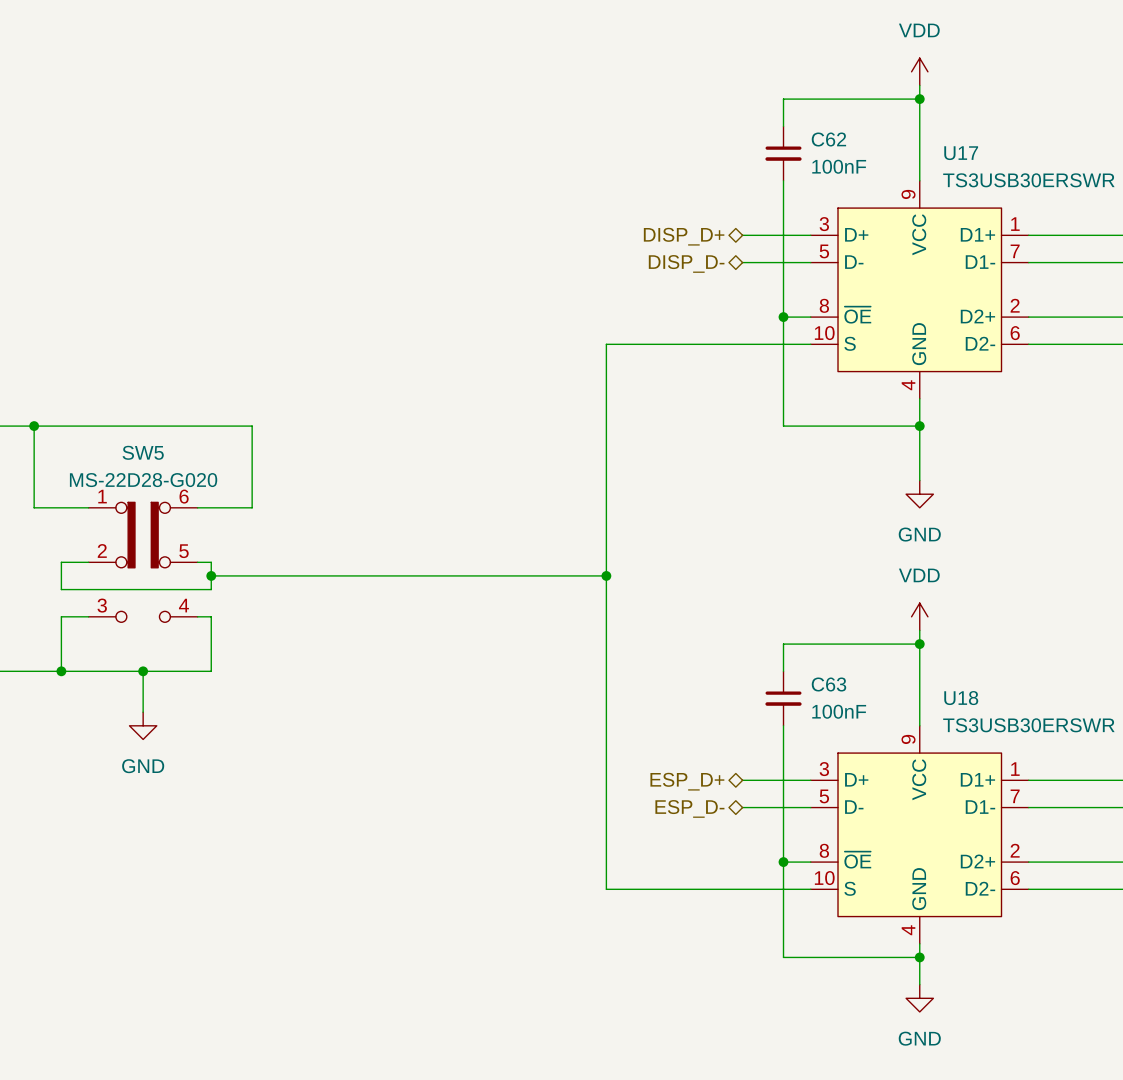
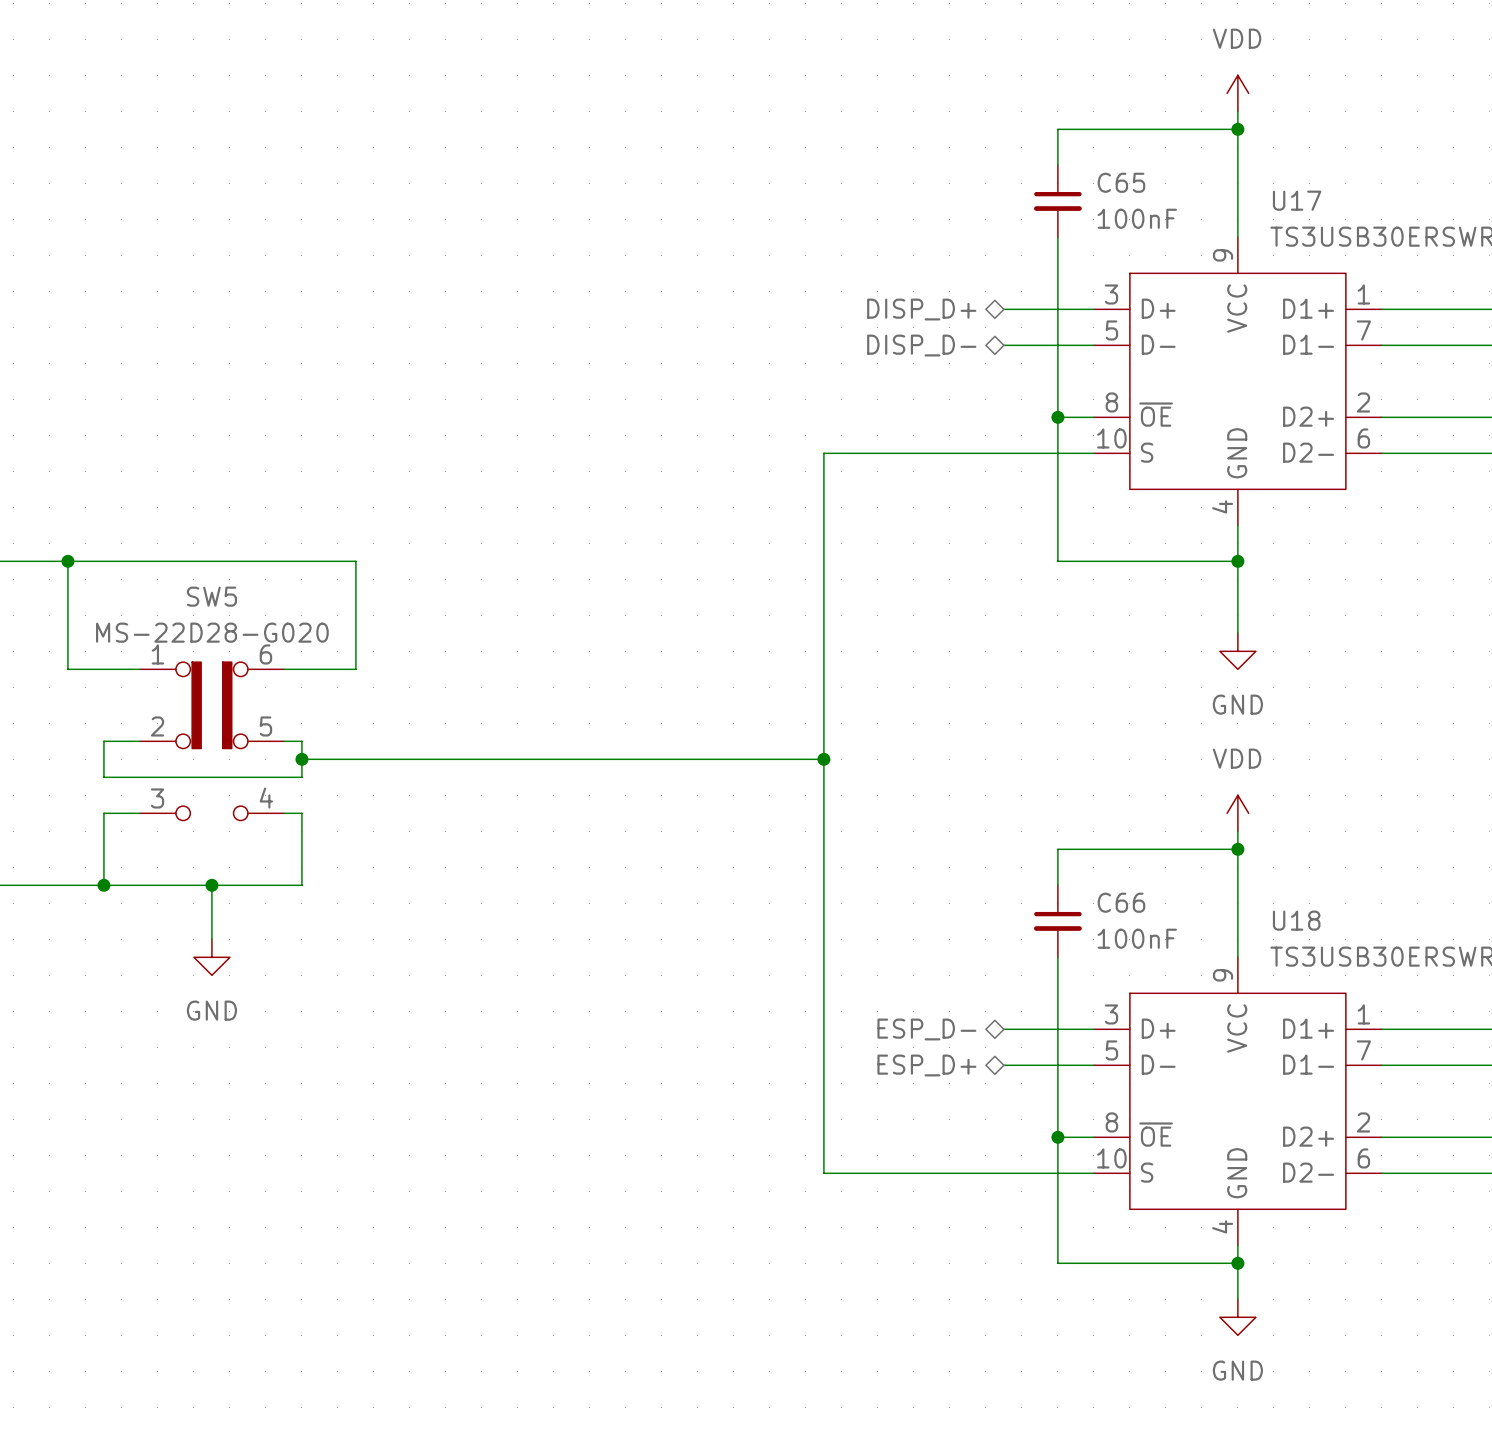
C62 name: C62 (828, 139) -> C65 (1121, 182)
C63 name: C63 (828, 684) -> C66 (1121, 902)
hierarchical label: ESP_D+ (687, 781) -> ESP_D- (926, 1029)
hierarchical label: ESP_D- (689, 808) -> ESP_D+ (926, 1065)

